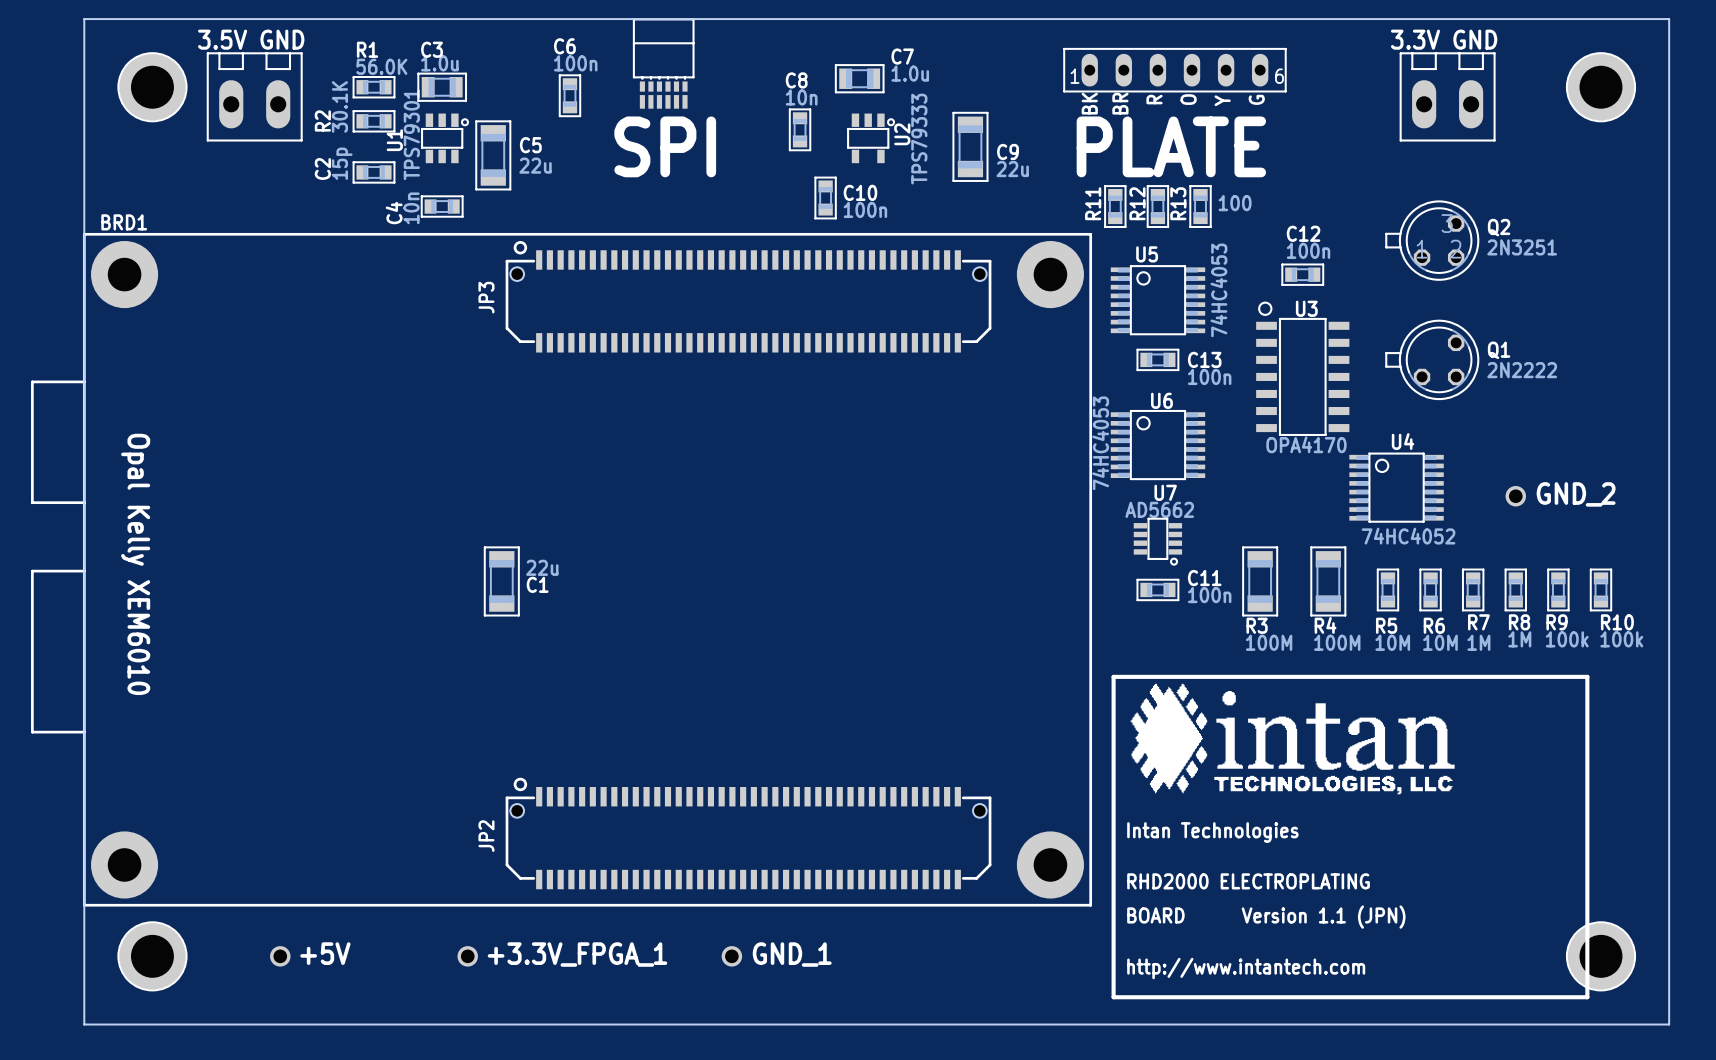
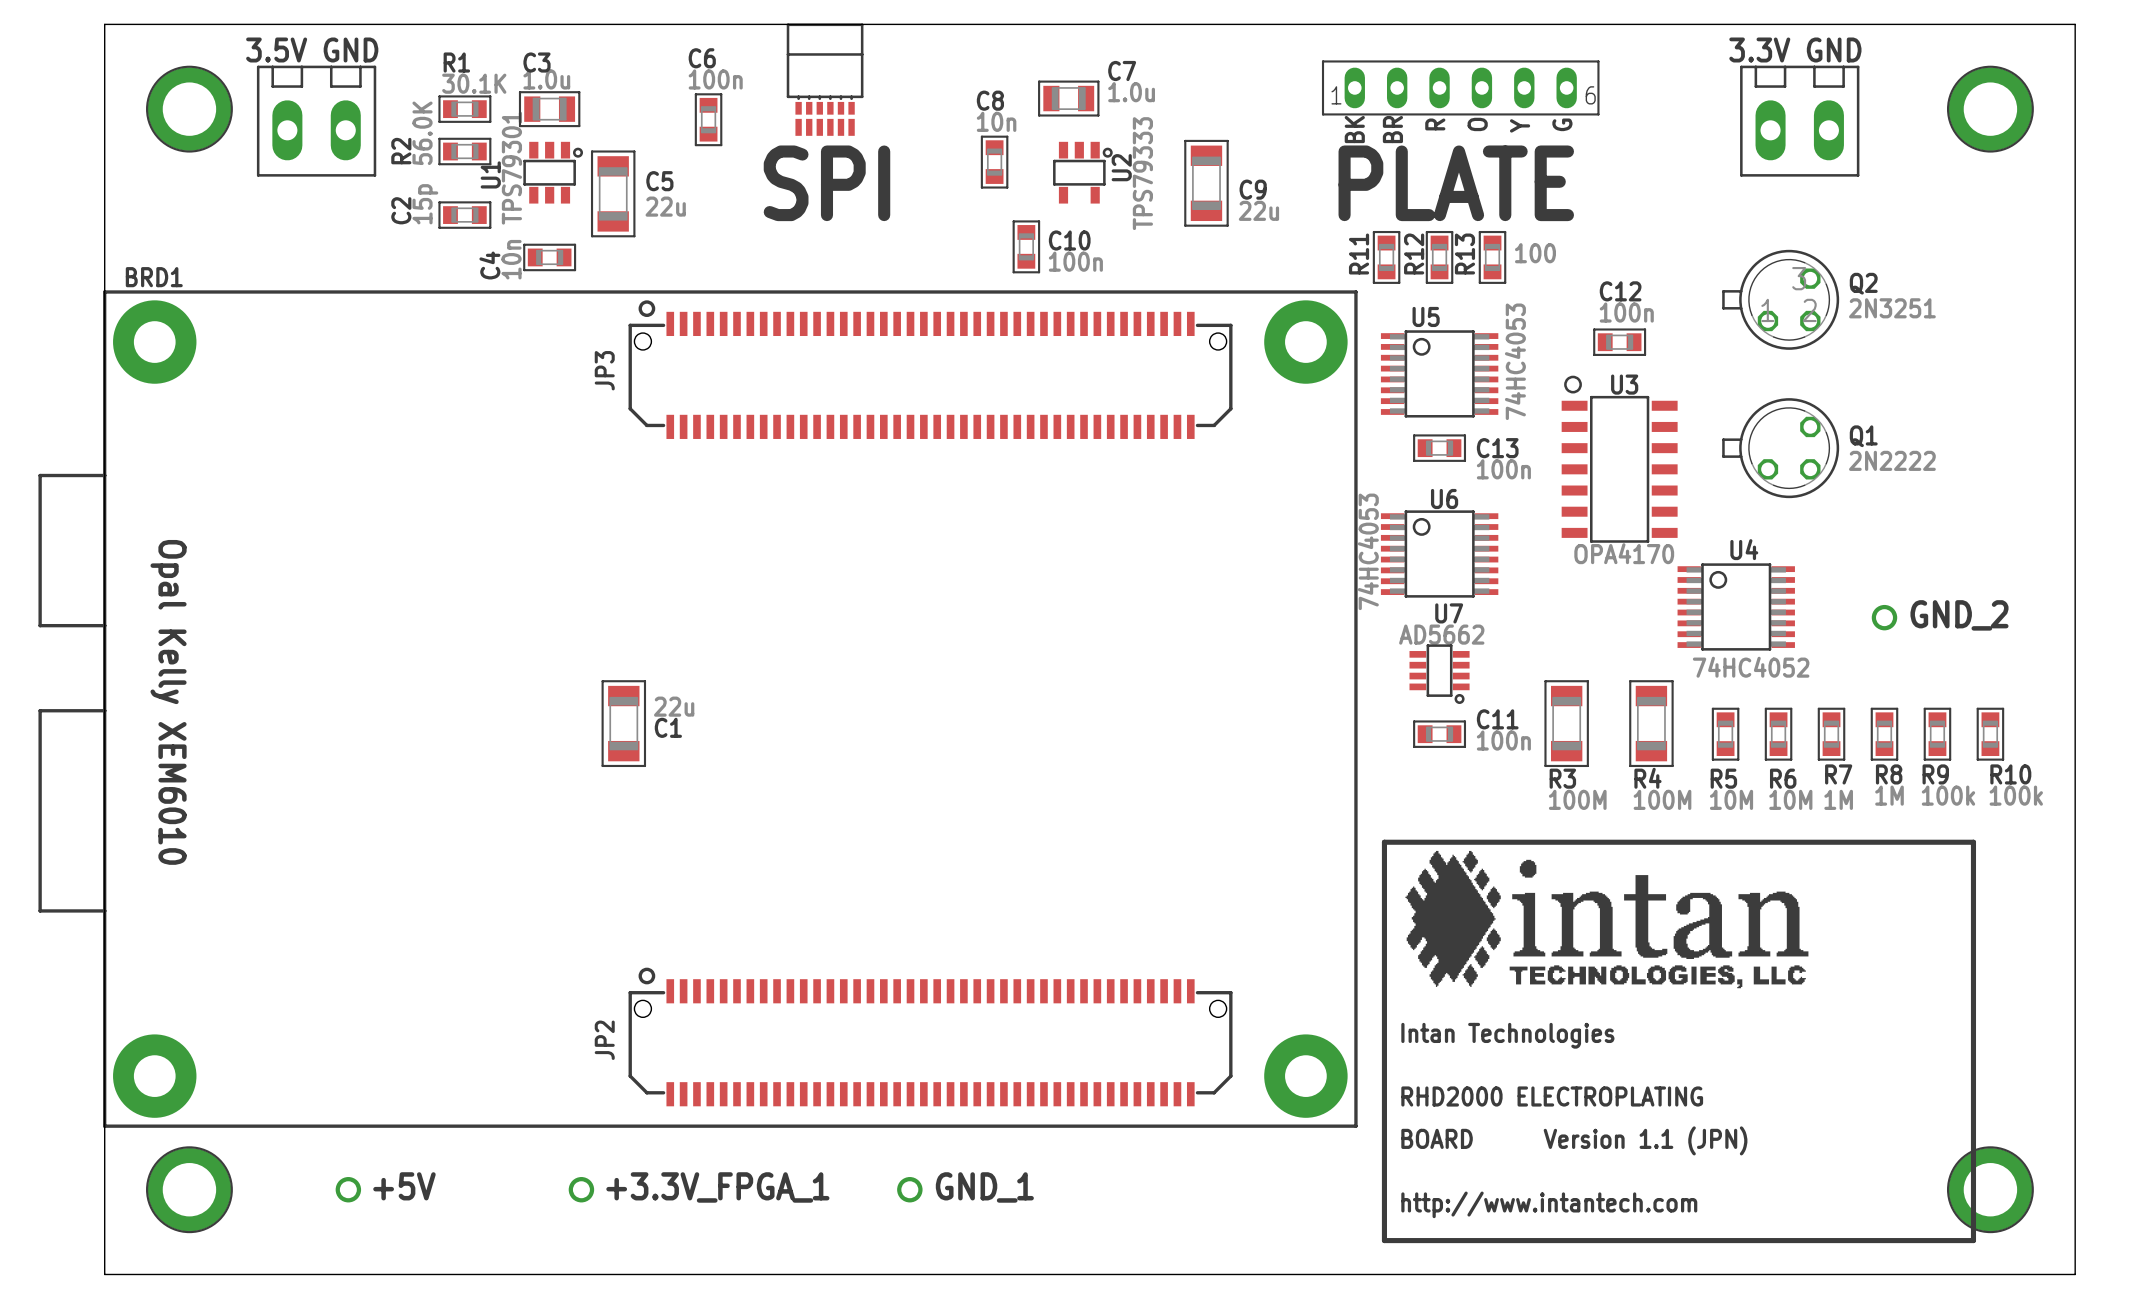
R2 value rotation: 0° (381, 66) -> 90° counterclockwise (422, 133)
R1 value rotation: 0° (339, 106) -> 90° clockwise (474, 83)

